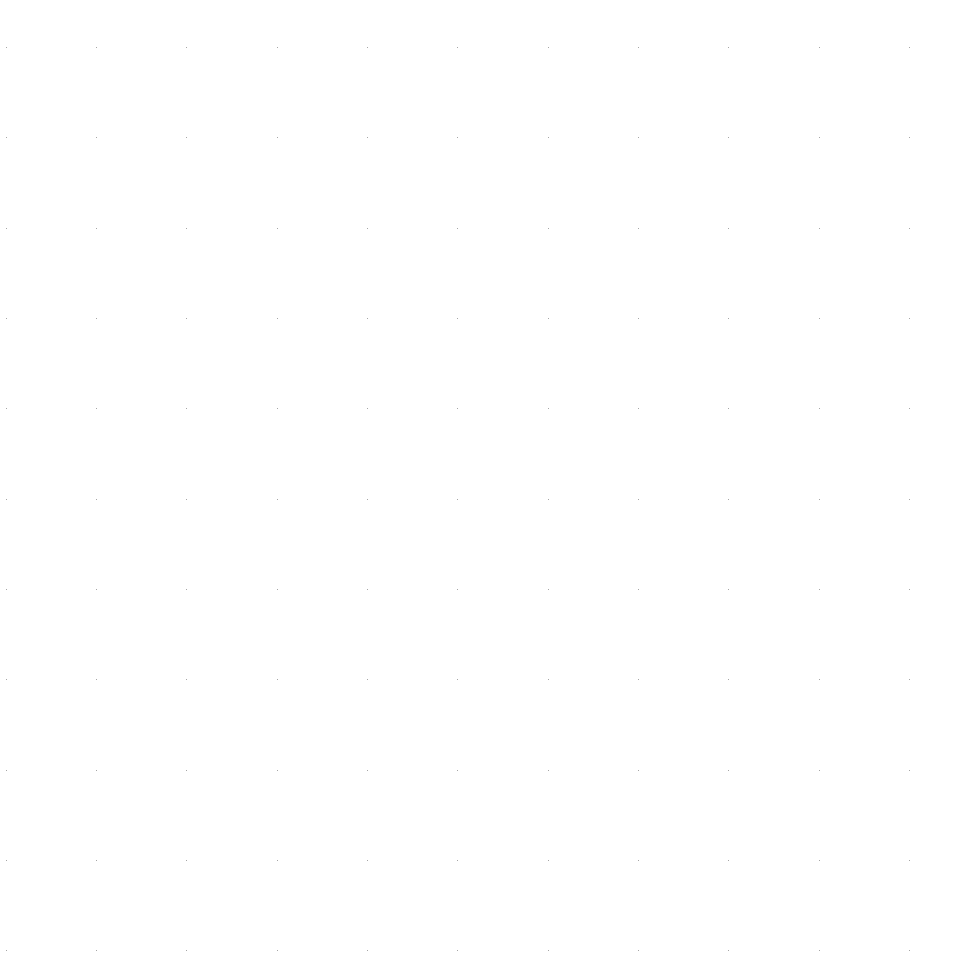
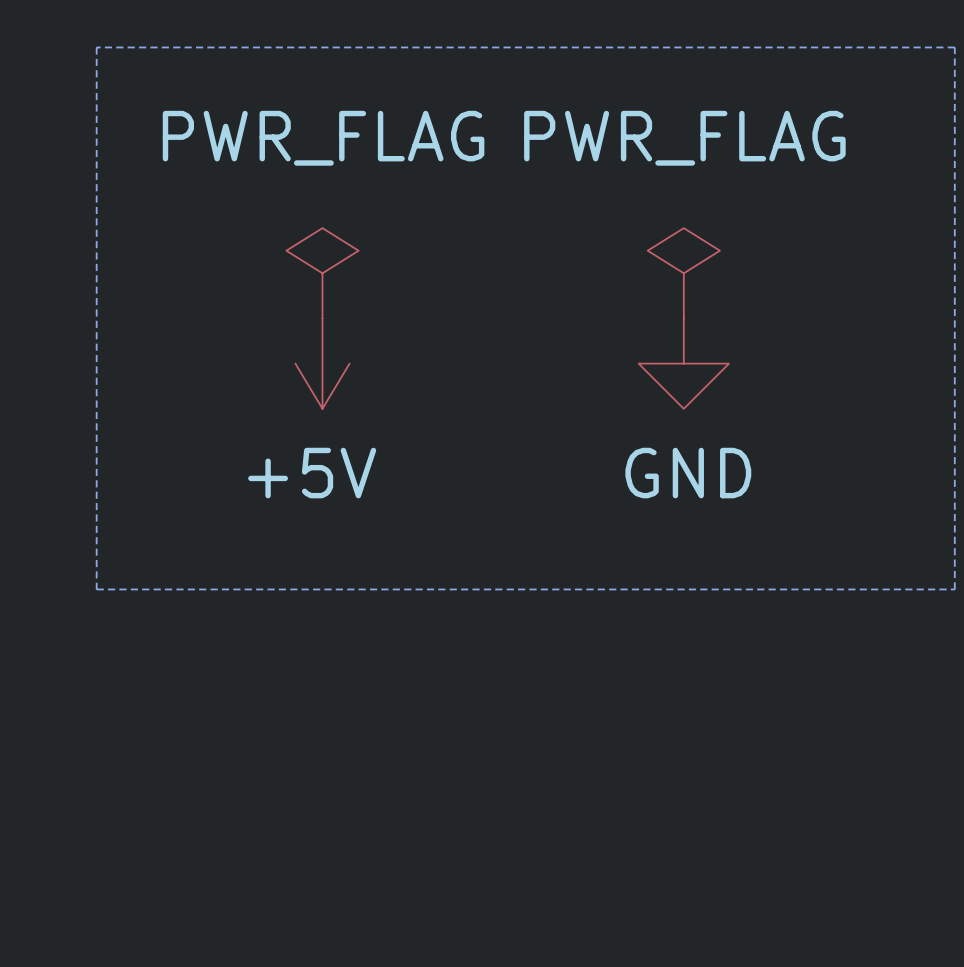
line: none -> (96, 47) (954, 47) (954, 589) (96, 589) (96, 47)
power symbol: none -> PWR_FLAG (322, 273)
power symbol: none -> PWR_FLAG (683, 273)
power symbol: none -> +5V (322, 363)
power symbol: none -> GND (683, 363)

